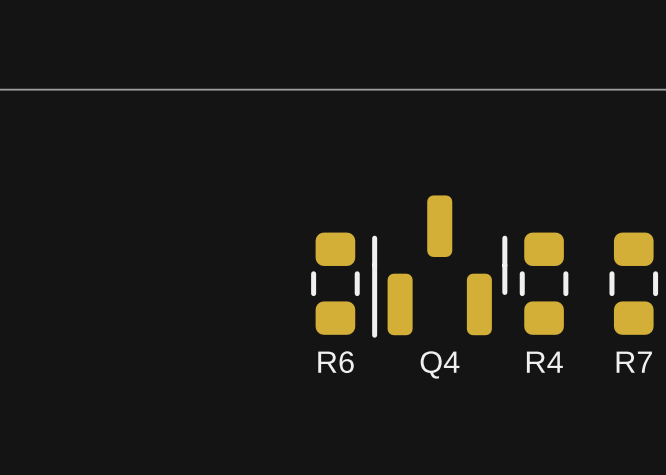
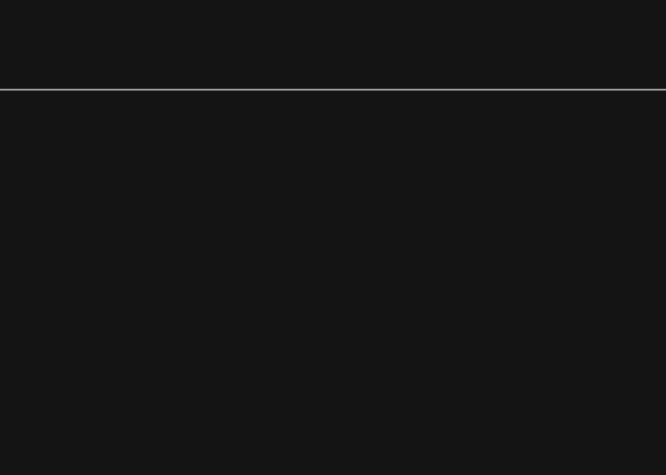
Q4: (439, 266) -> none
R6: (335, 283) -> none
R4: (544, 283) -> none
R7: (633, 283) -> none

